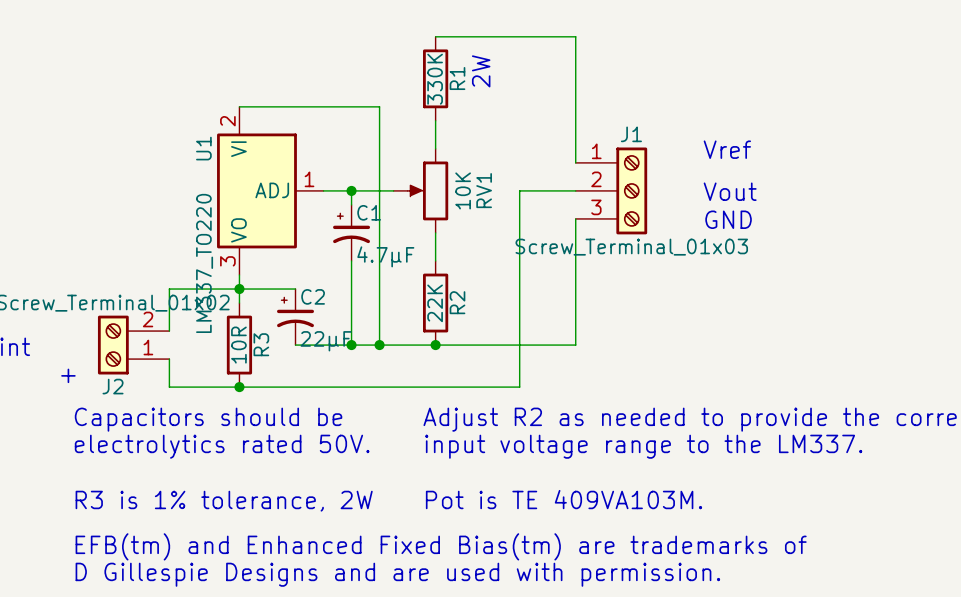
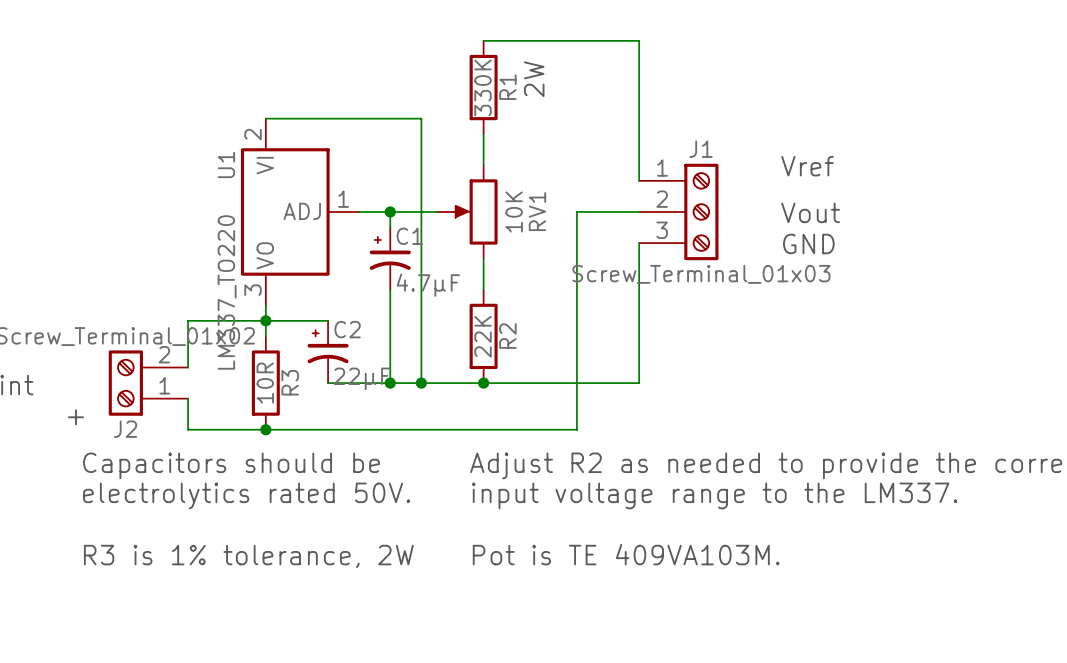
text: EFB(tm) and Enhanced Fixed Bias(tm) are trademarks of (441, 546) -> none
text: D Gillespie Designs and are used with permission. (397, 574) -> none

